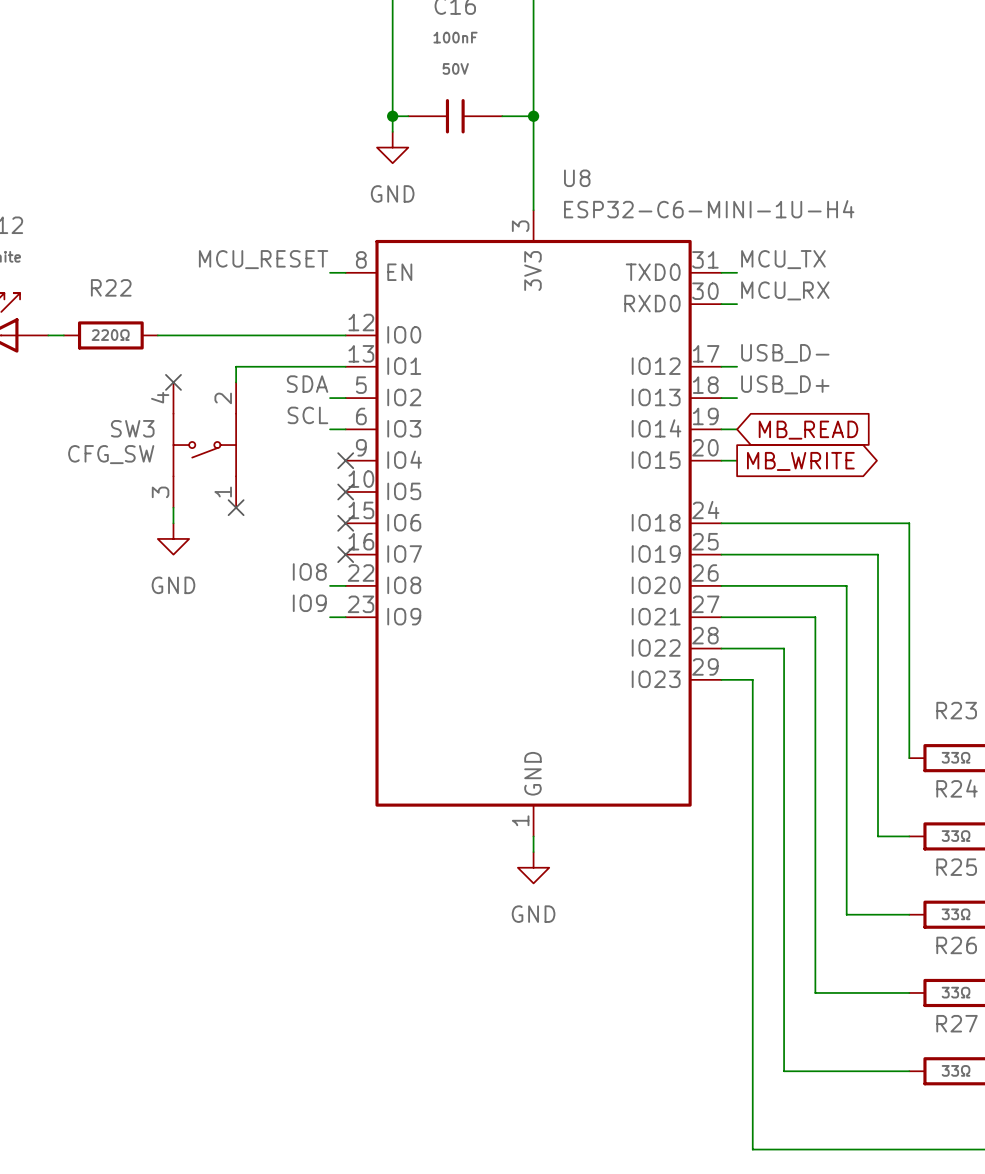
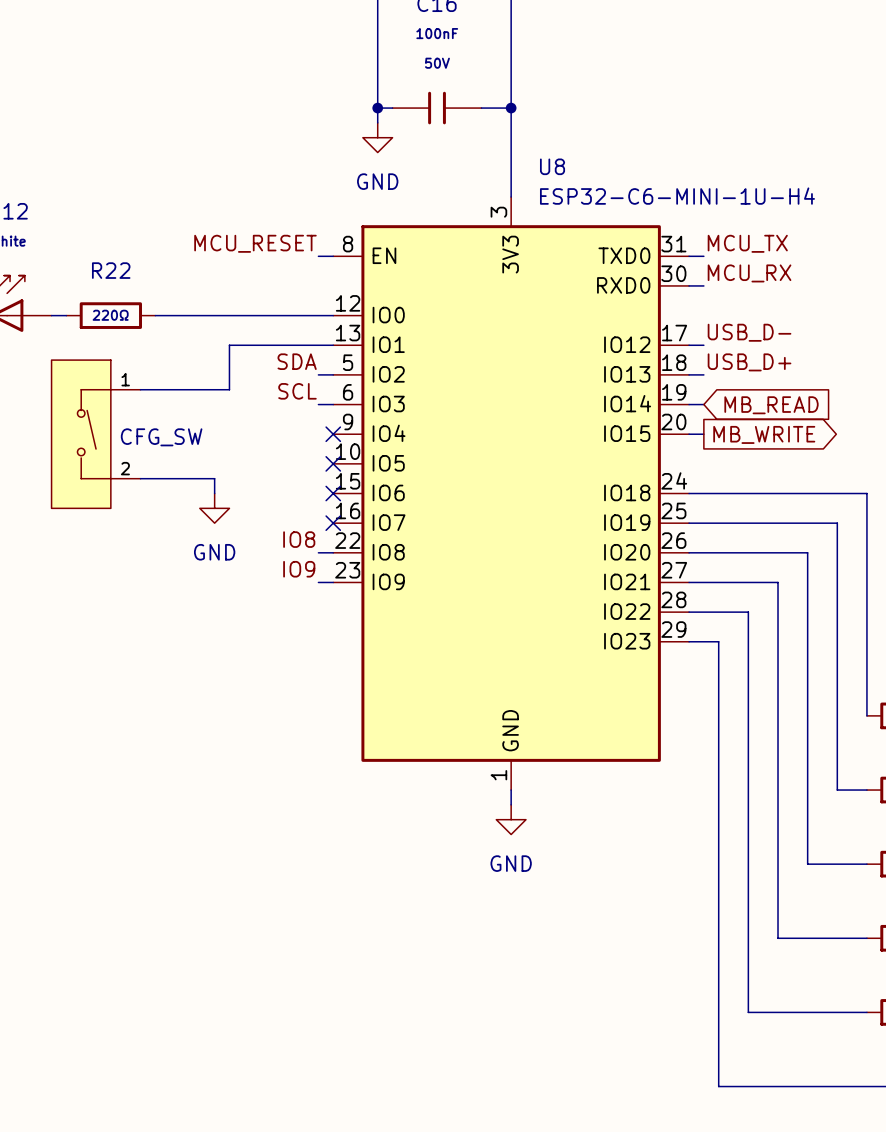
no-connect mark: (173, 382) -> none
wire: none -> (229, 360) (229, 389) (140, 389)
SW3: (204, 445) -> none
part: none -> (96, 434)
wire: none -> (140, 478) (214, 478) (214, 493)
wire: (173, 507) (173, 523) -> none
no-connect mark: (236, 507) -> none
power symbol position: GND (173, 538) -> GND (214, 508)

